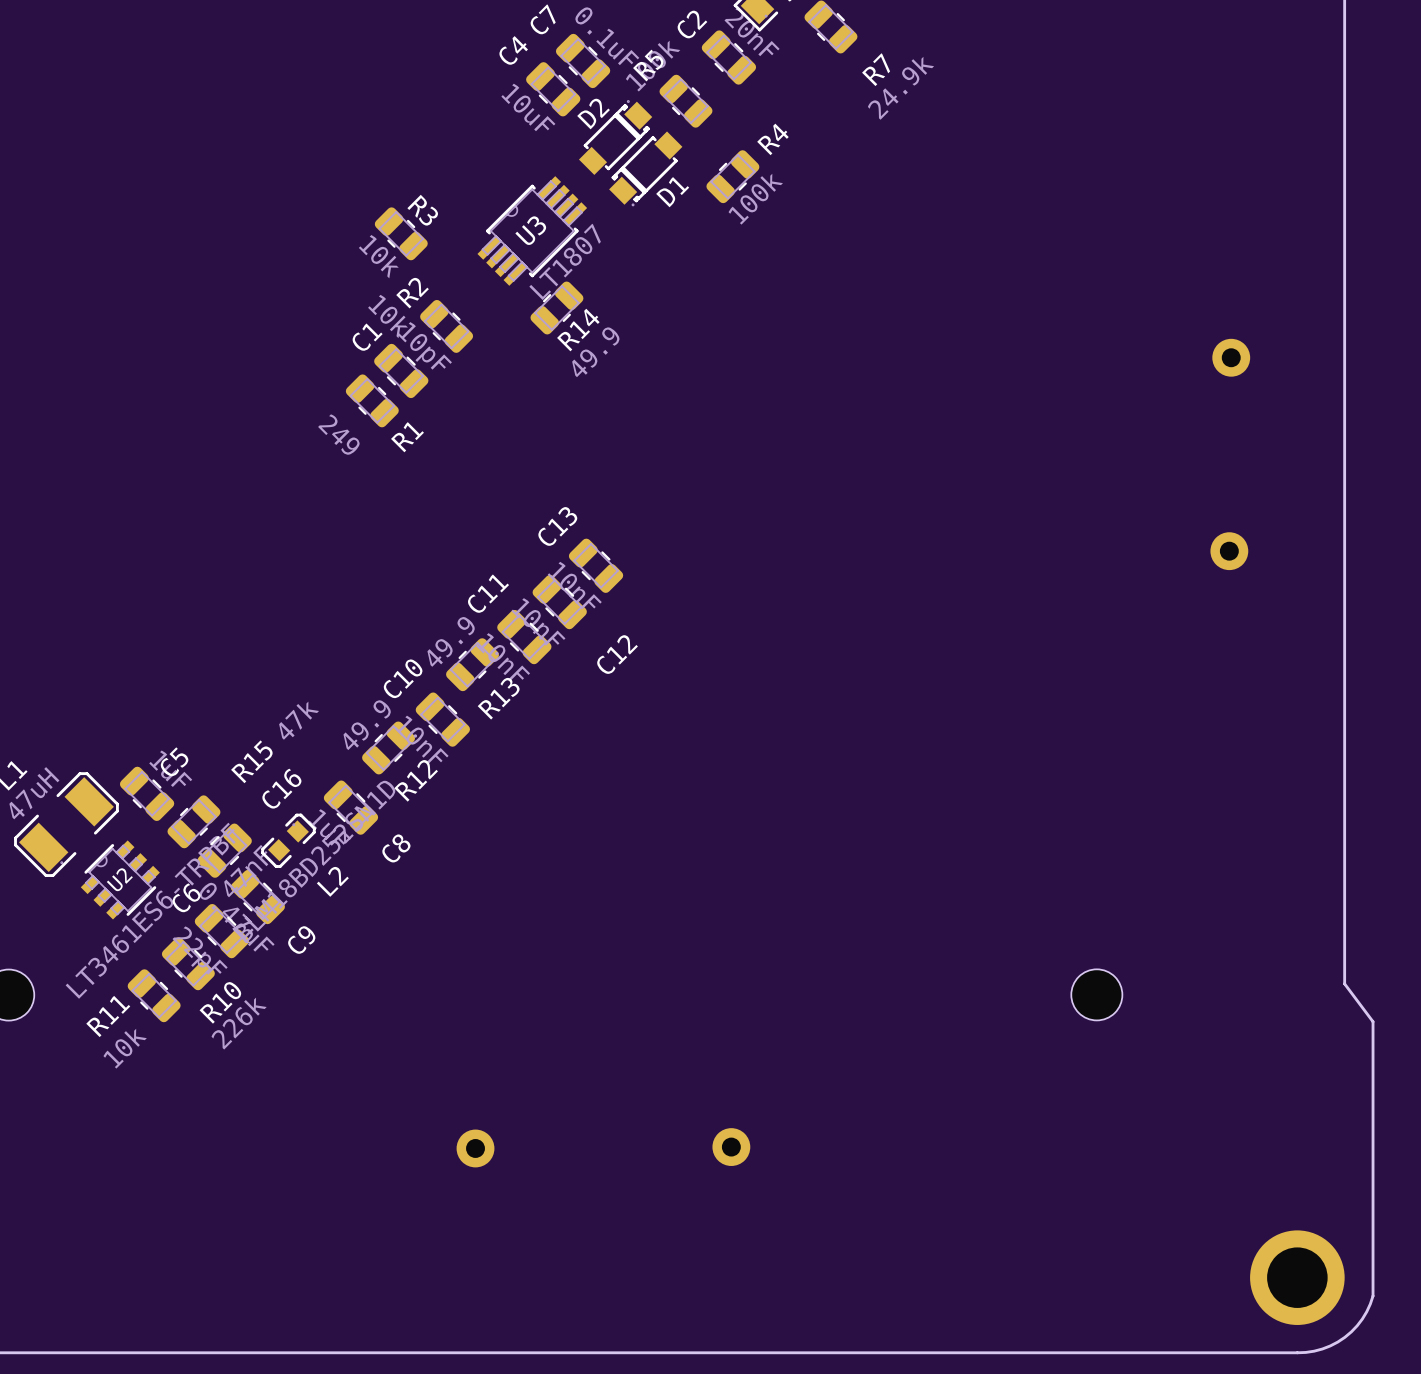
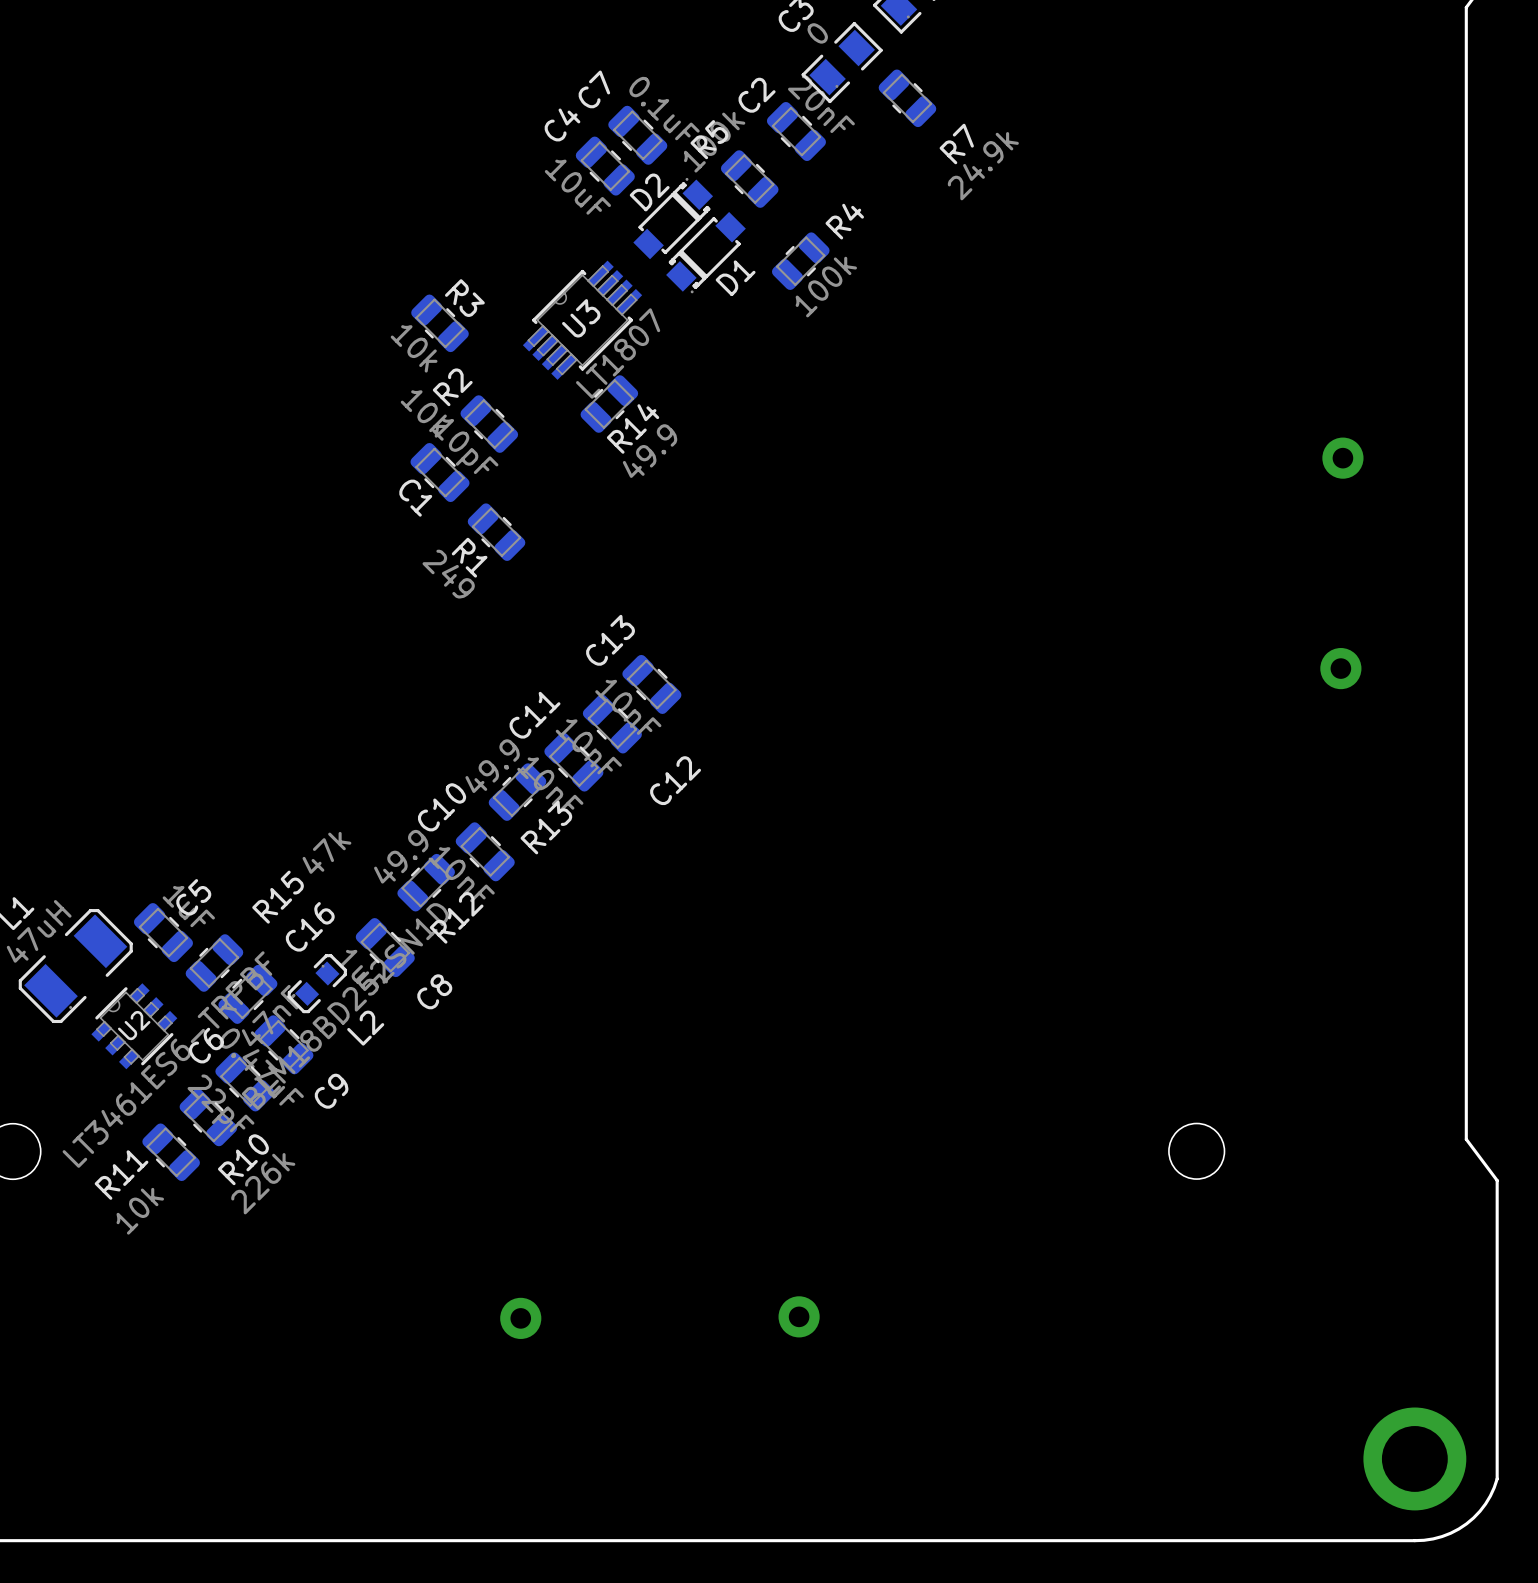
C1 name rotation: 0° (367, 337) -> 90° clockwise (415, 498)
R1 position: (372, 400) -> (496, 532)
R1 value position: 249 (339, 434) -> 249 (448, 574)
R1 name rotation: 0° (407, 437) -> 90° clockwise (469, 557)

